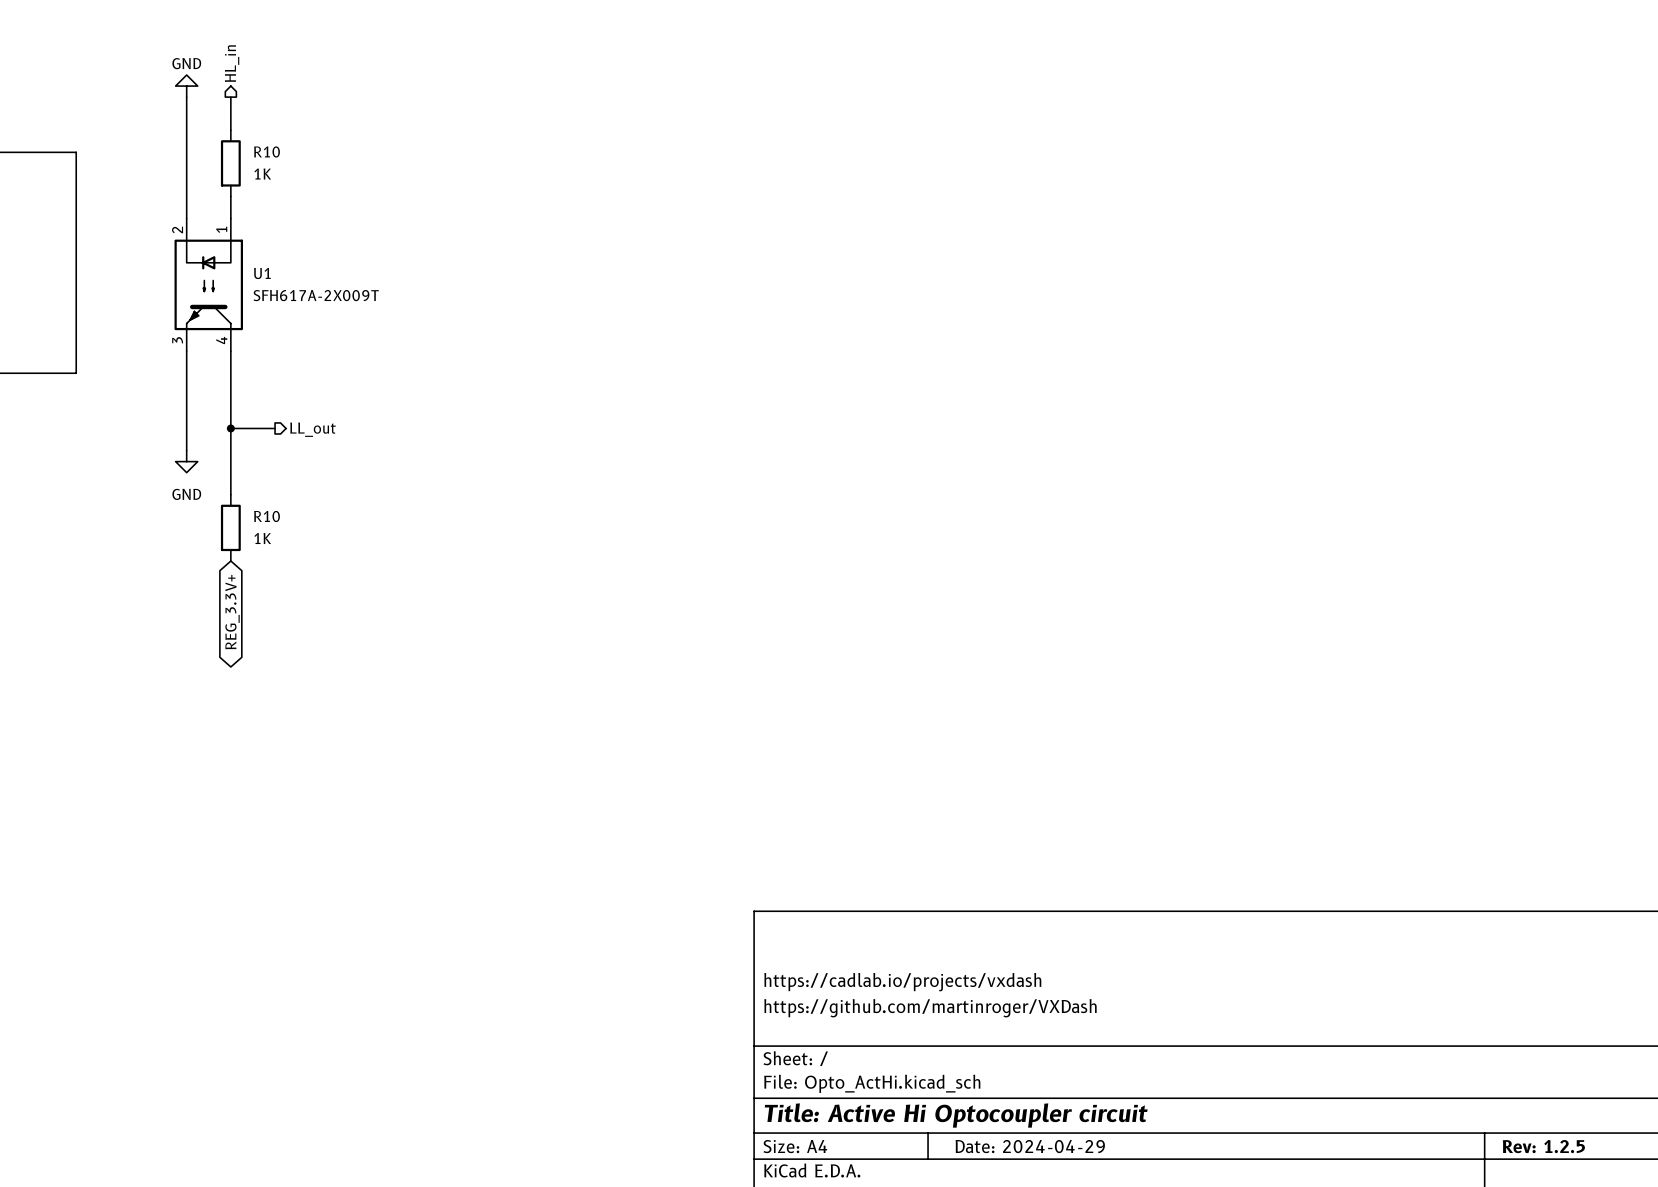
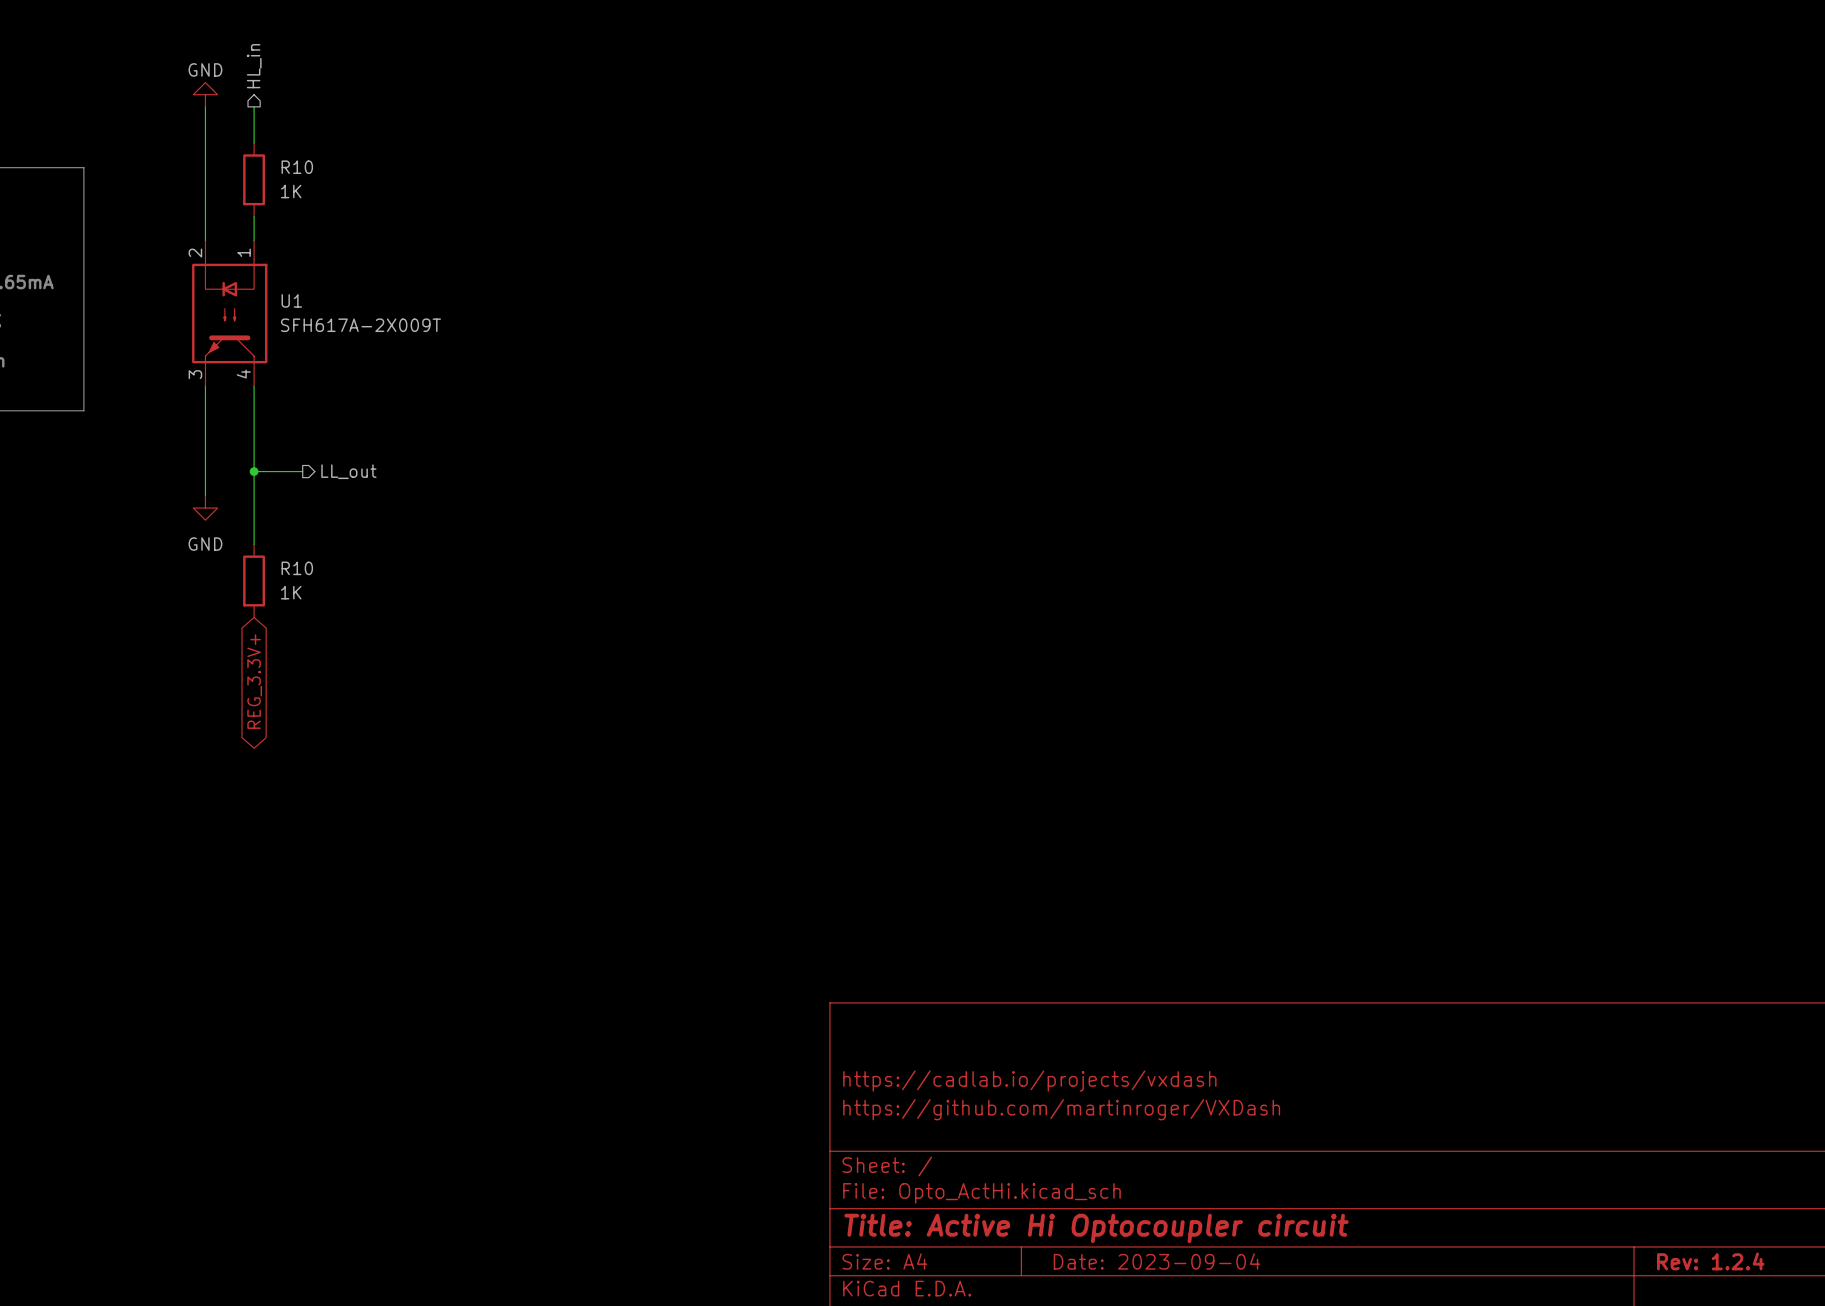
title block: Date: 2024-04-29 (1030, 1146) -> Date: 2023-09-04 (1157, 1261)
title block: Rev: 1.2.5 (1543, 1146) -> Rev: 1.2.4 (1710, 1261)

